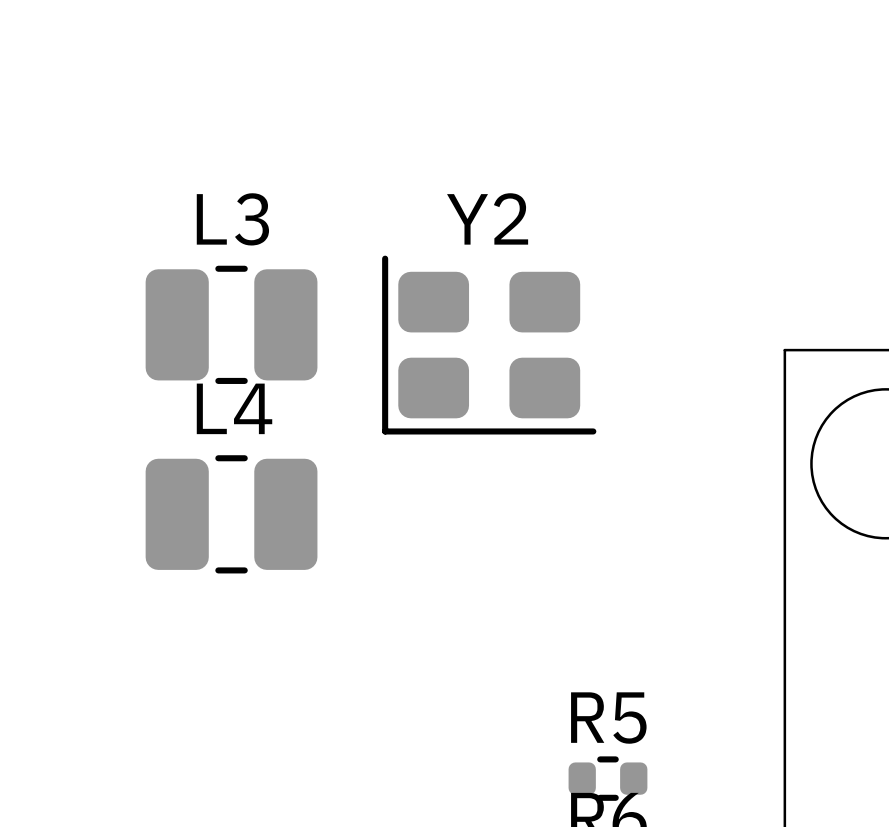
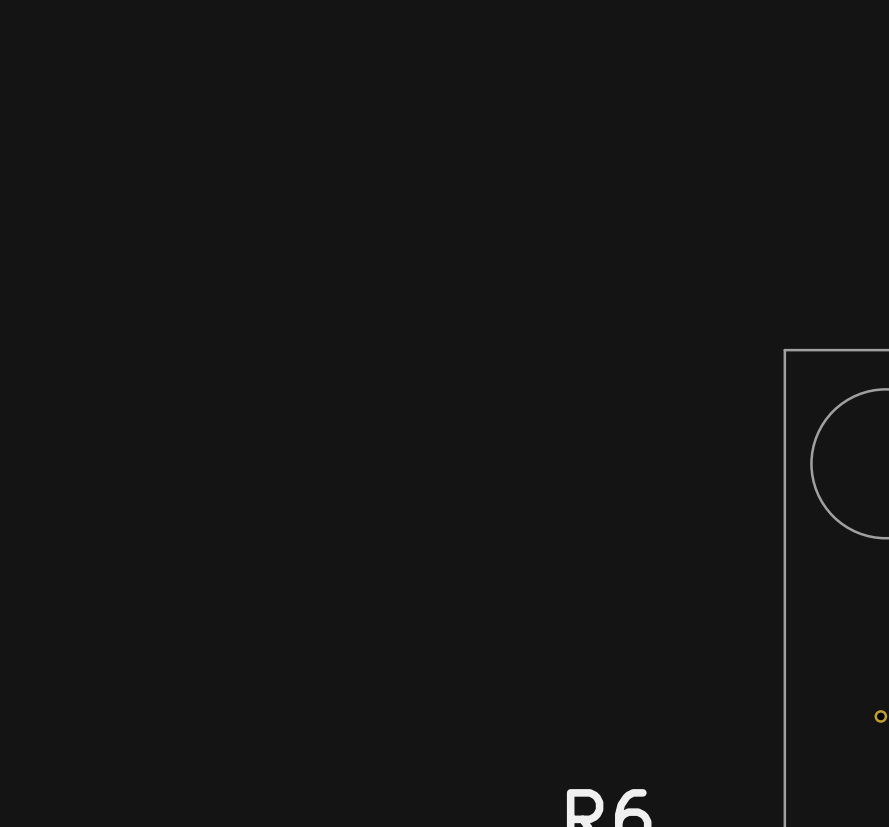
L3: (231, 324) -> none
Y2: (489, 345) -> none
L4: (231, 514) -> none
via: none -> (880, 716)
R5: (607, 778) -> none

